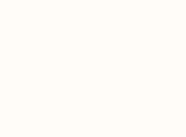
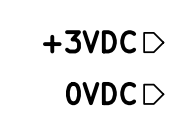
hierarchical label: none -> +3VDC (89, 41)
hierarchical label: none -> 0VDC (101, 93)

